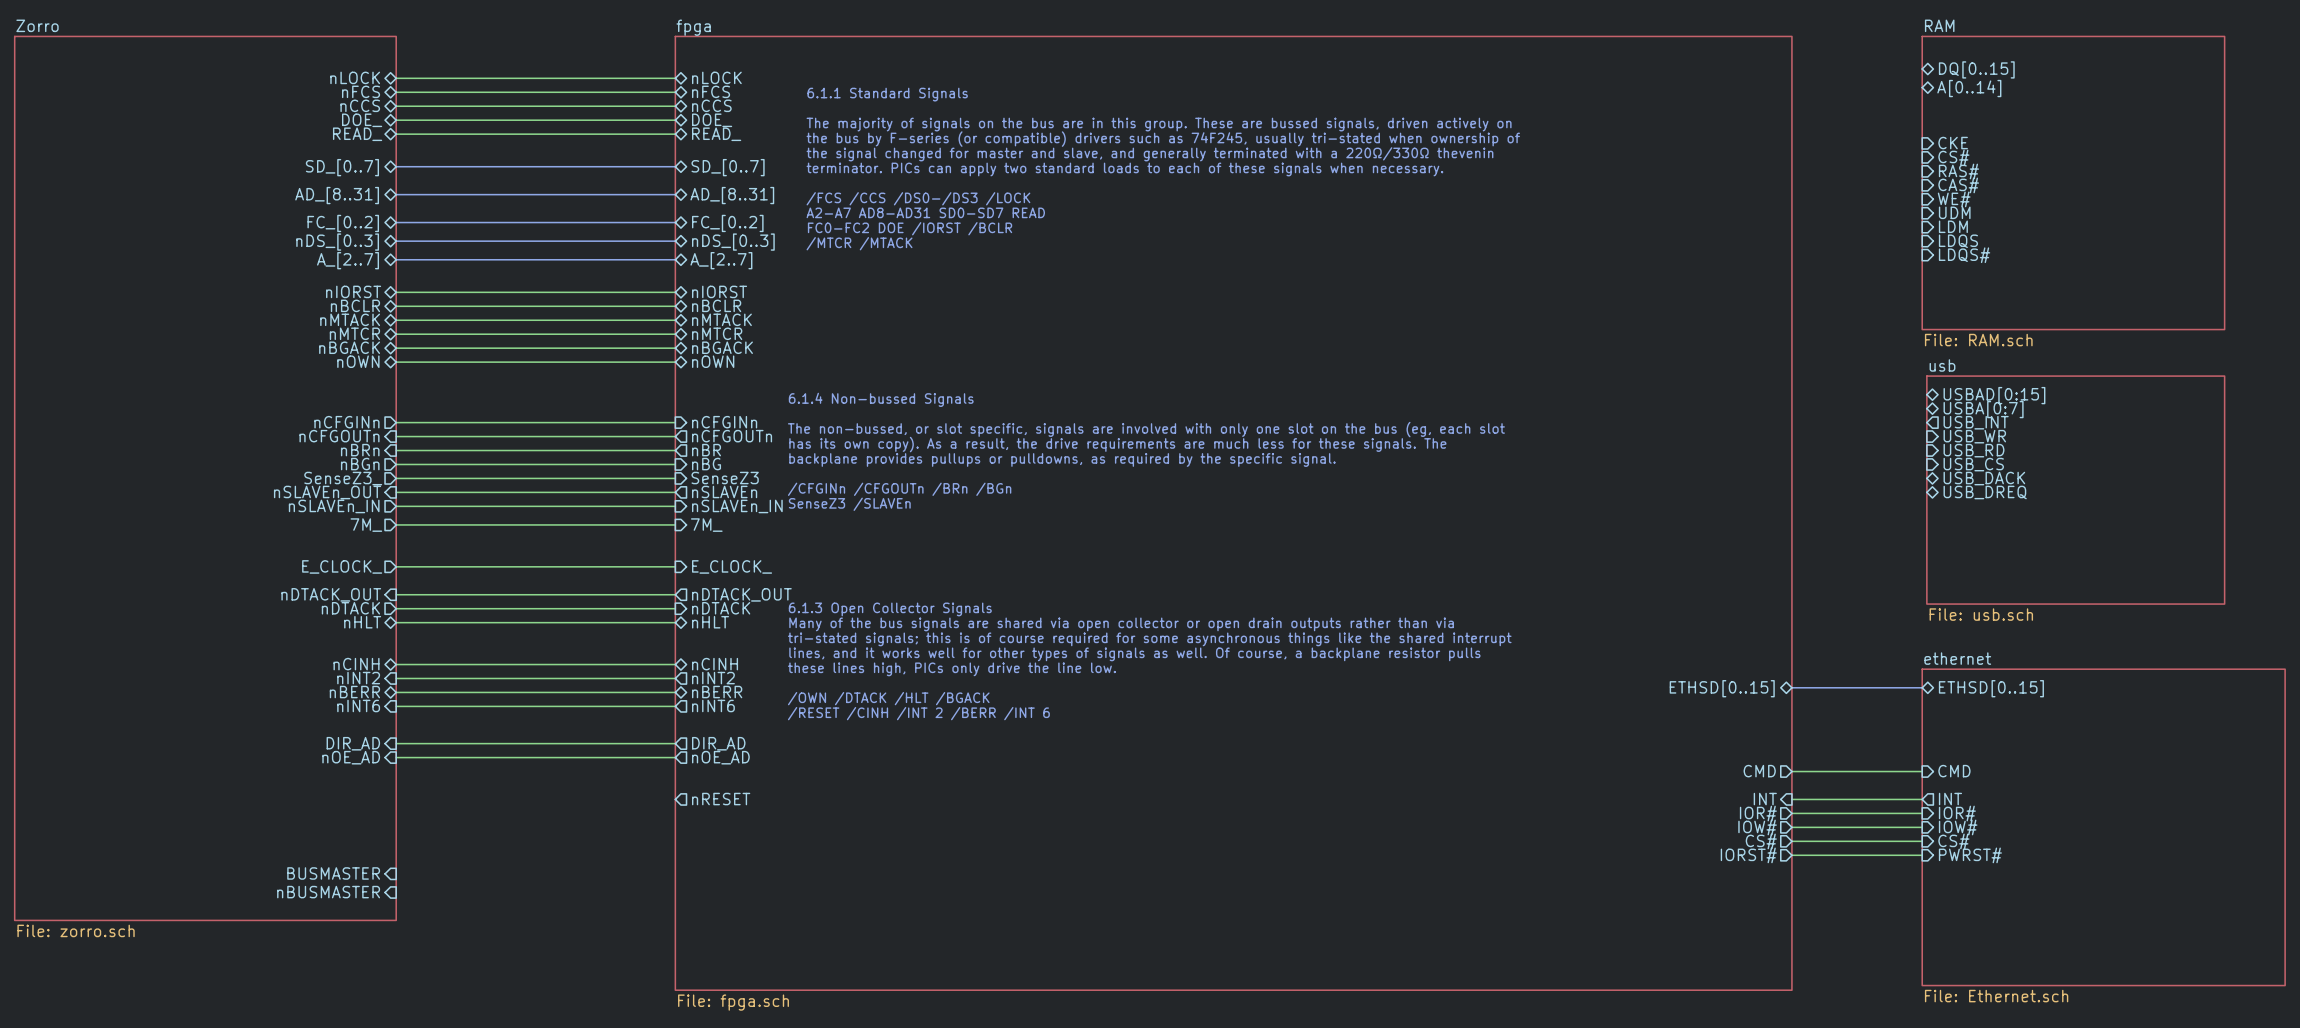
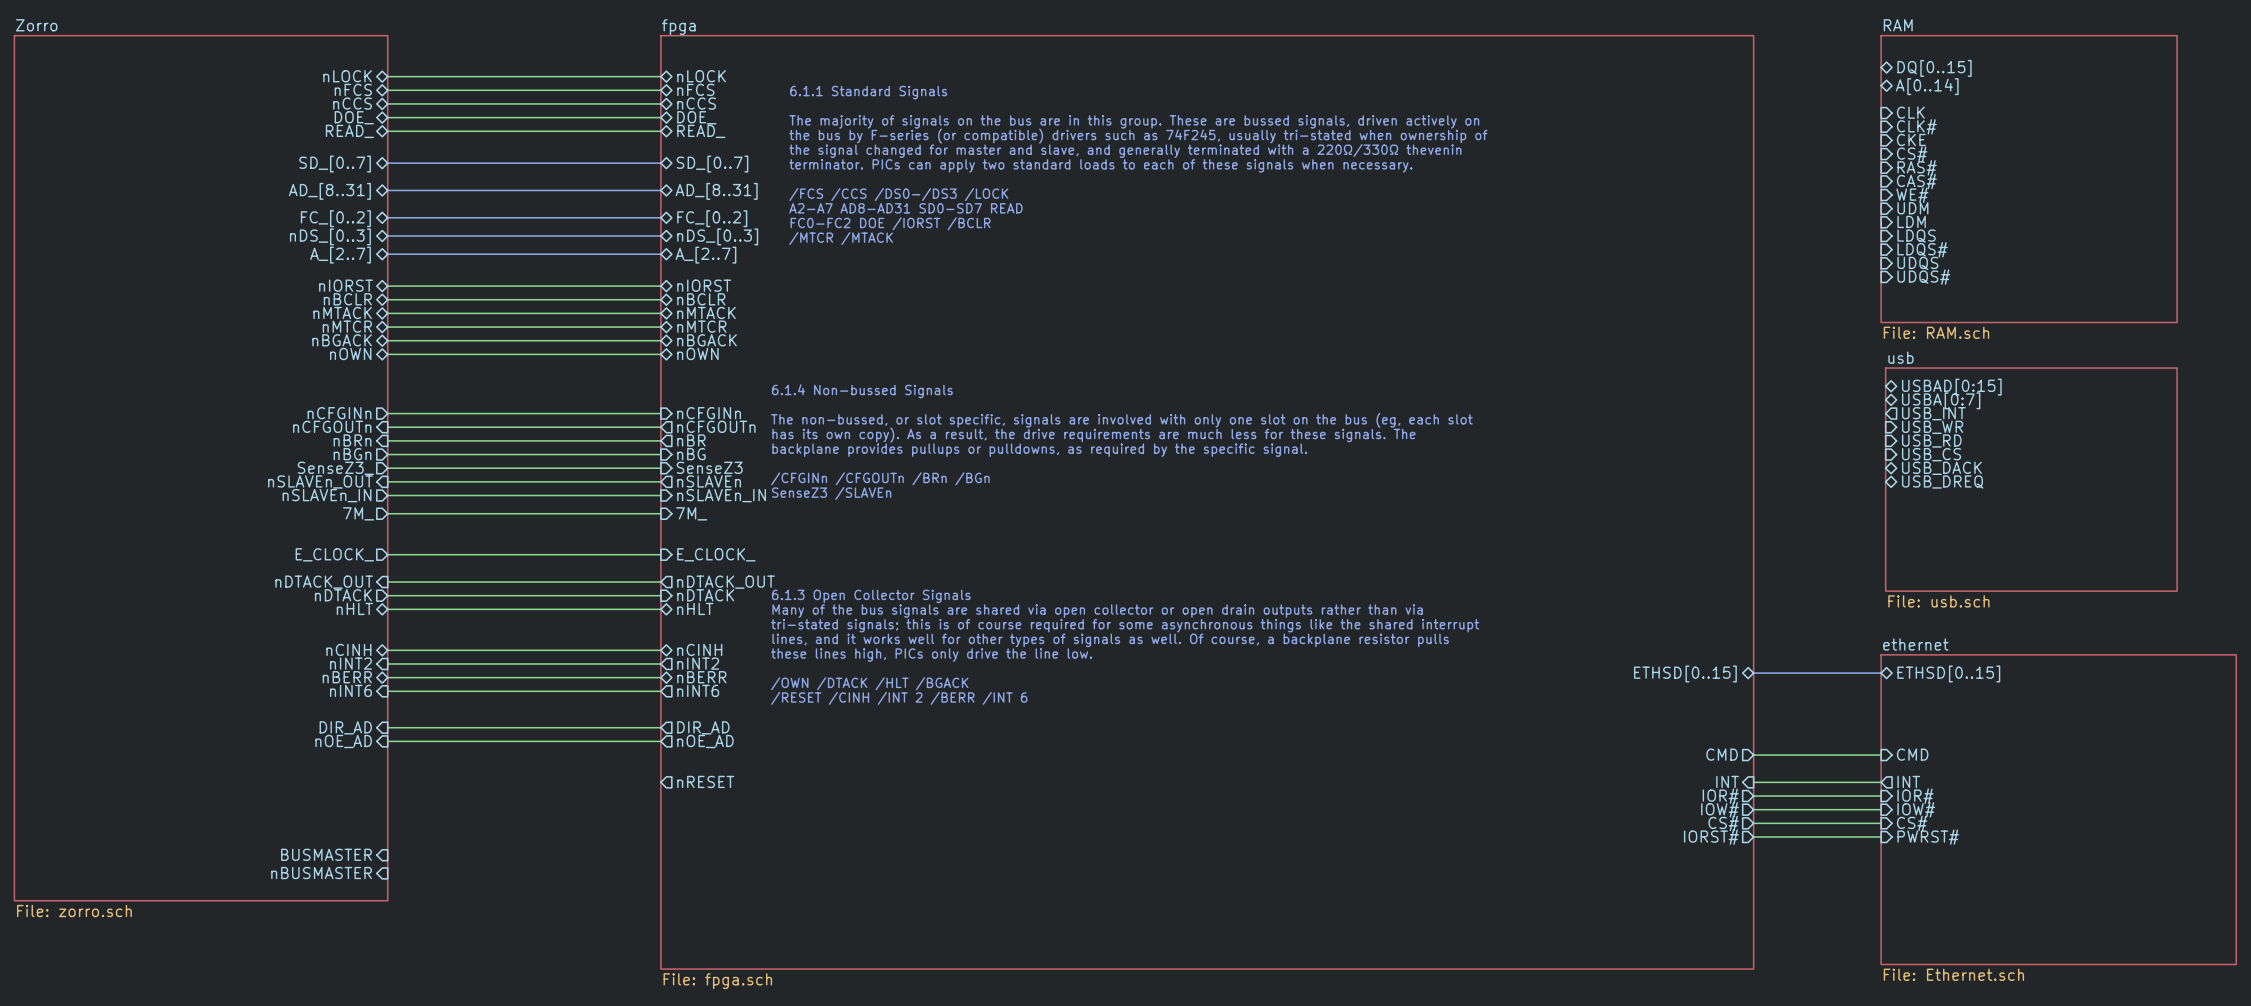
sheet pin: none -> CLK (1910, 112)
sheet pin: none -> CLK# (1916, 126)
sheet pin: none -> UDQS (1917, 263)
sheet pin: none -> UDQS# (1923, 277)

